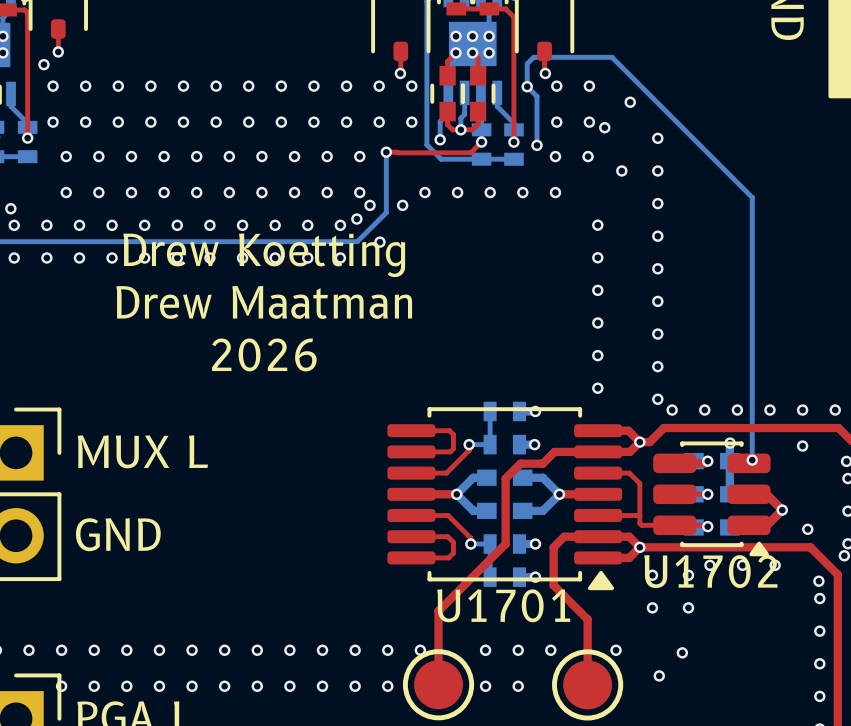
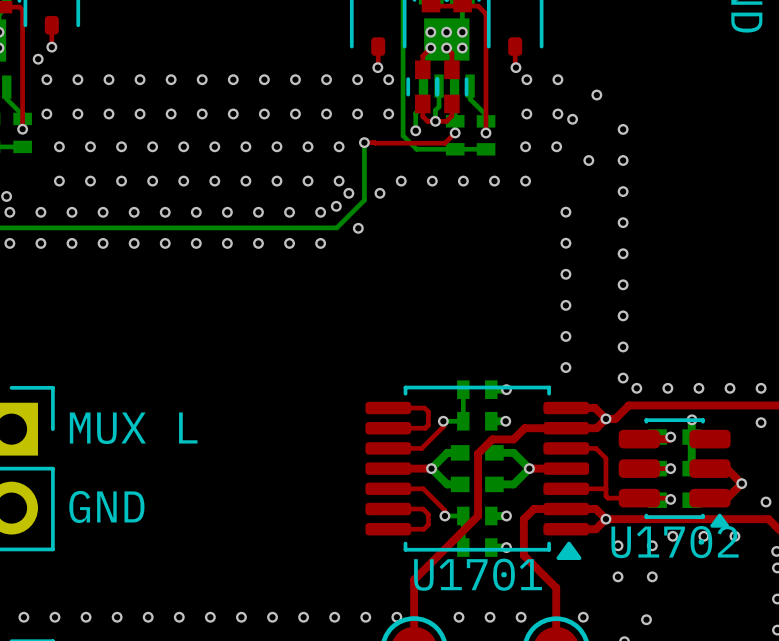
via: (527, 86) -> none
bottom track: (536, 145) (536, 96) (527, 86) (527, 63) (533, 57) (612, 57) (752, 197) (752, 458) (748, 463) -> none
via: (536, 145) -> none
text: Drew Koetting (264, 255) -> none
text: Drew Maatman (264, 302) -> none
text: 2026 (264, 354) -> none
via: (752, 460) -> none

